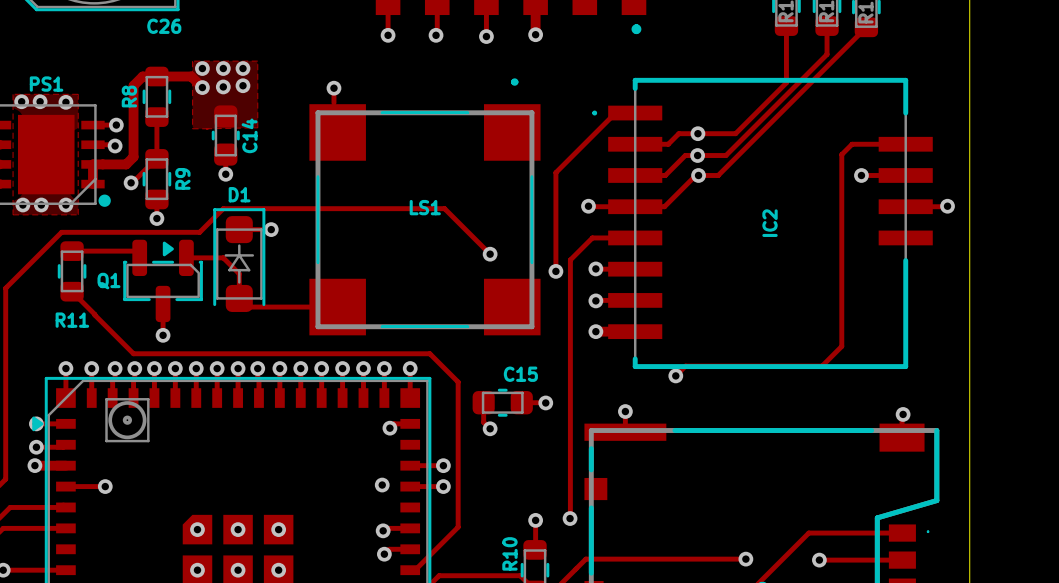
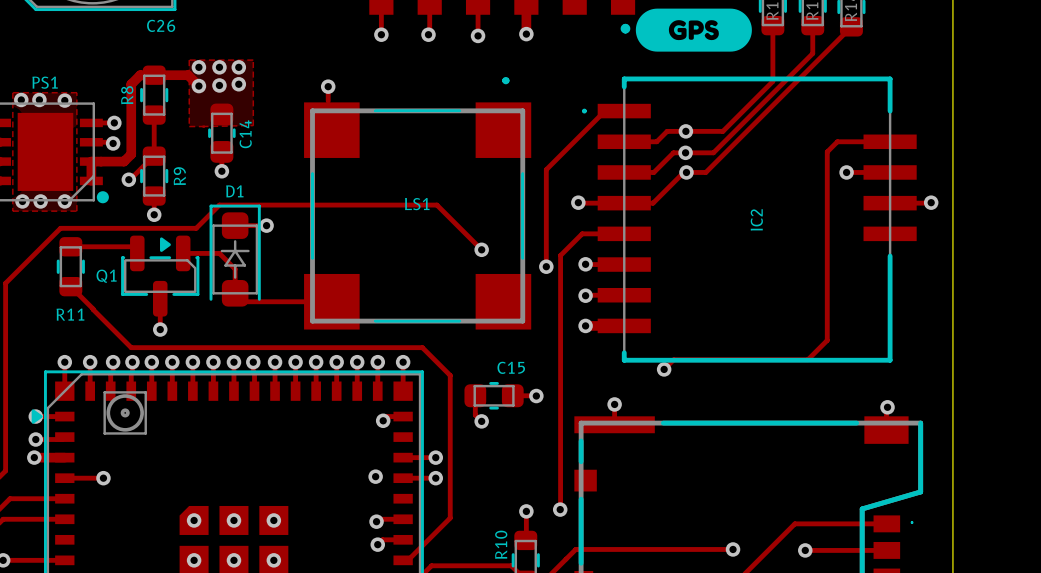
drawing: none -> [635, 8, 752, 52]

